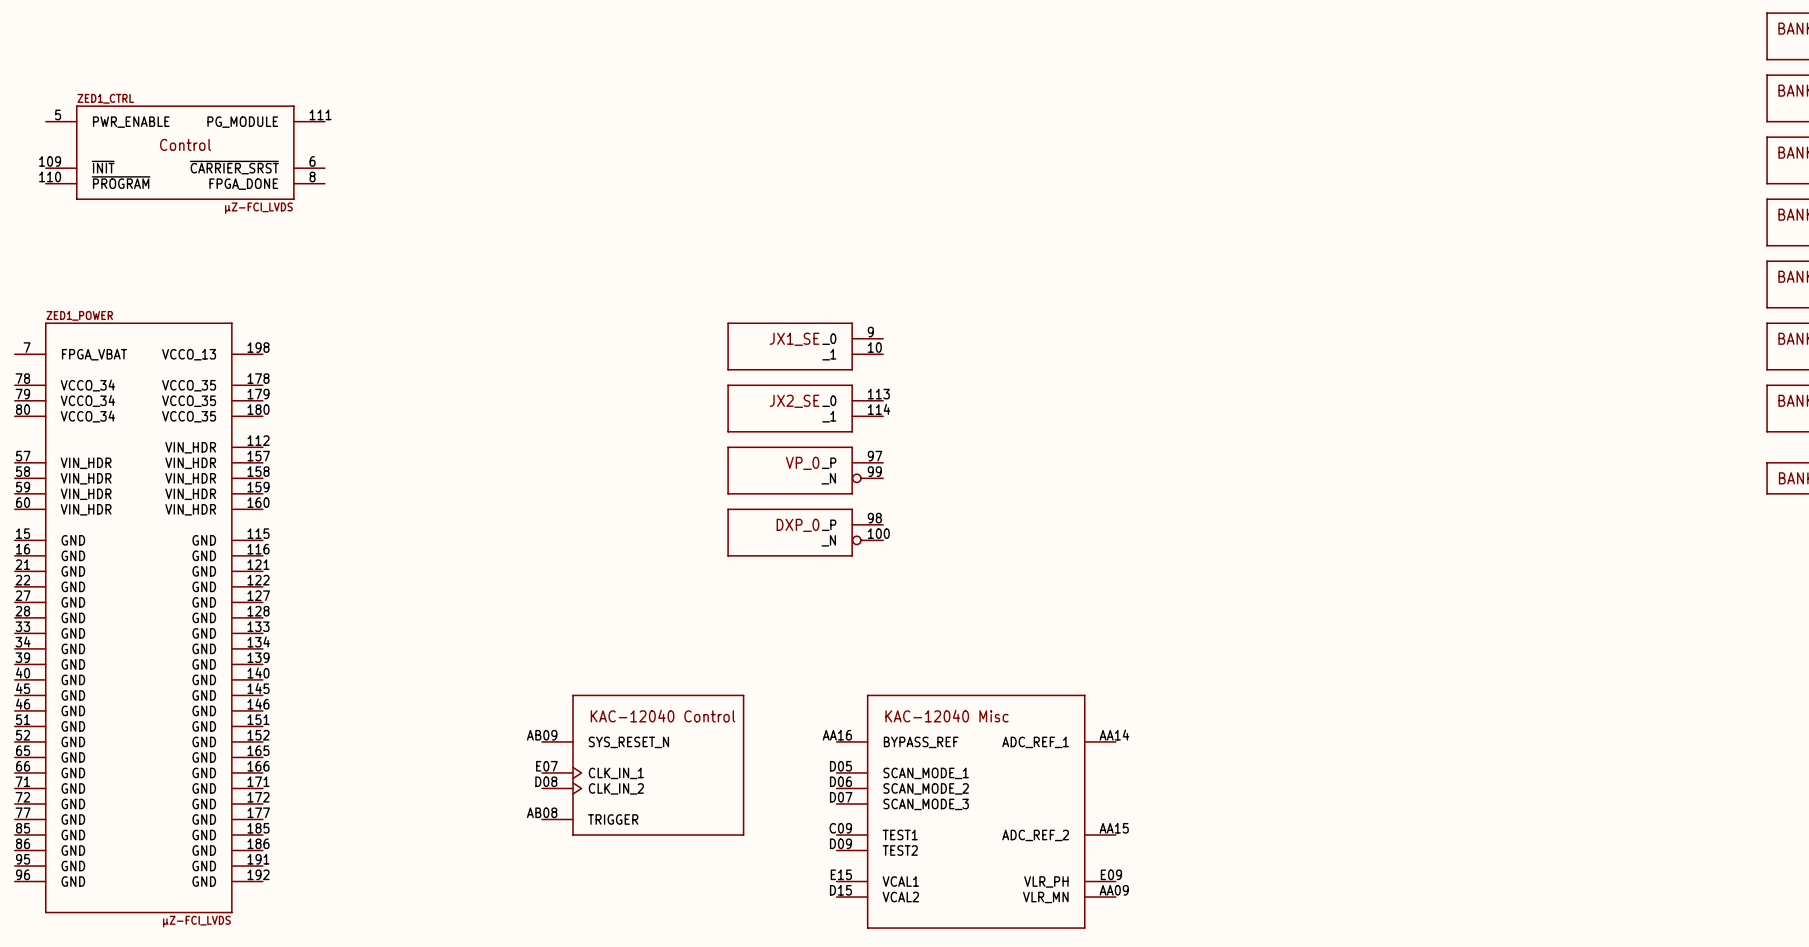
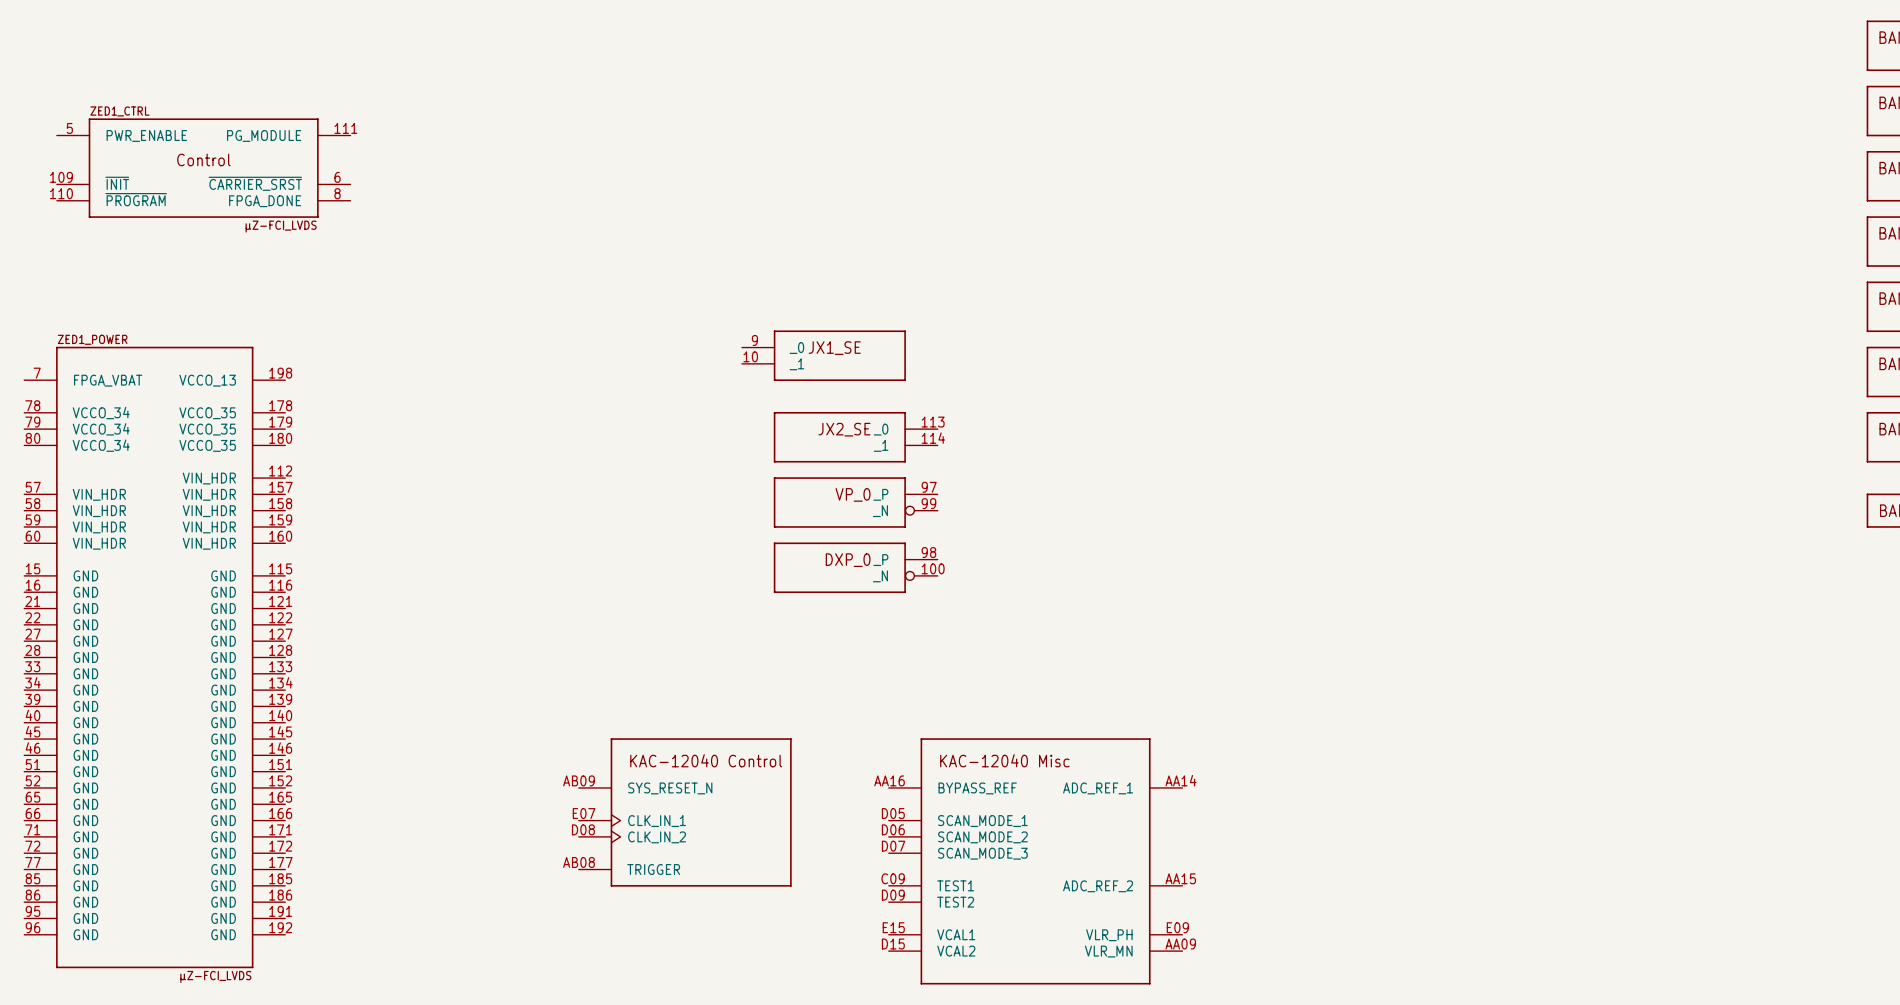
part: none -> (823, 355)
part: (805, 346) -> none

